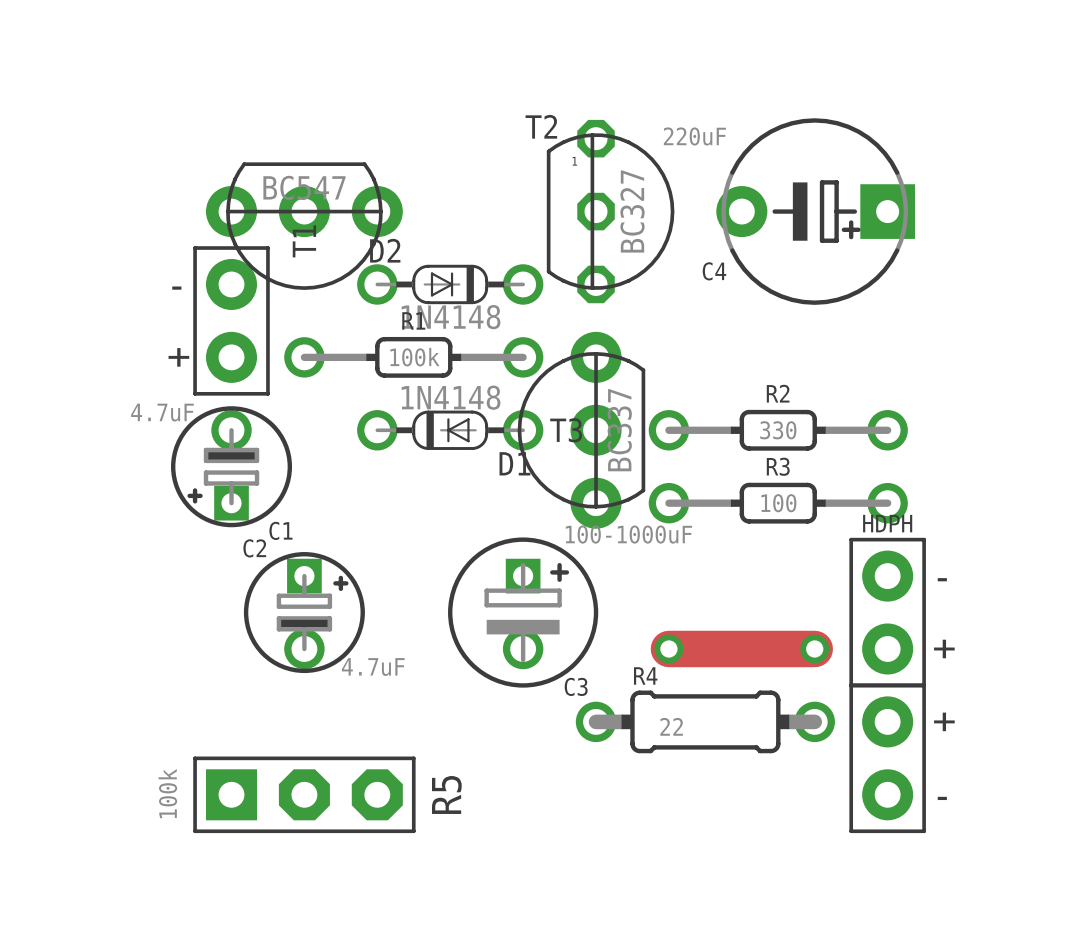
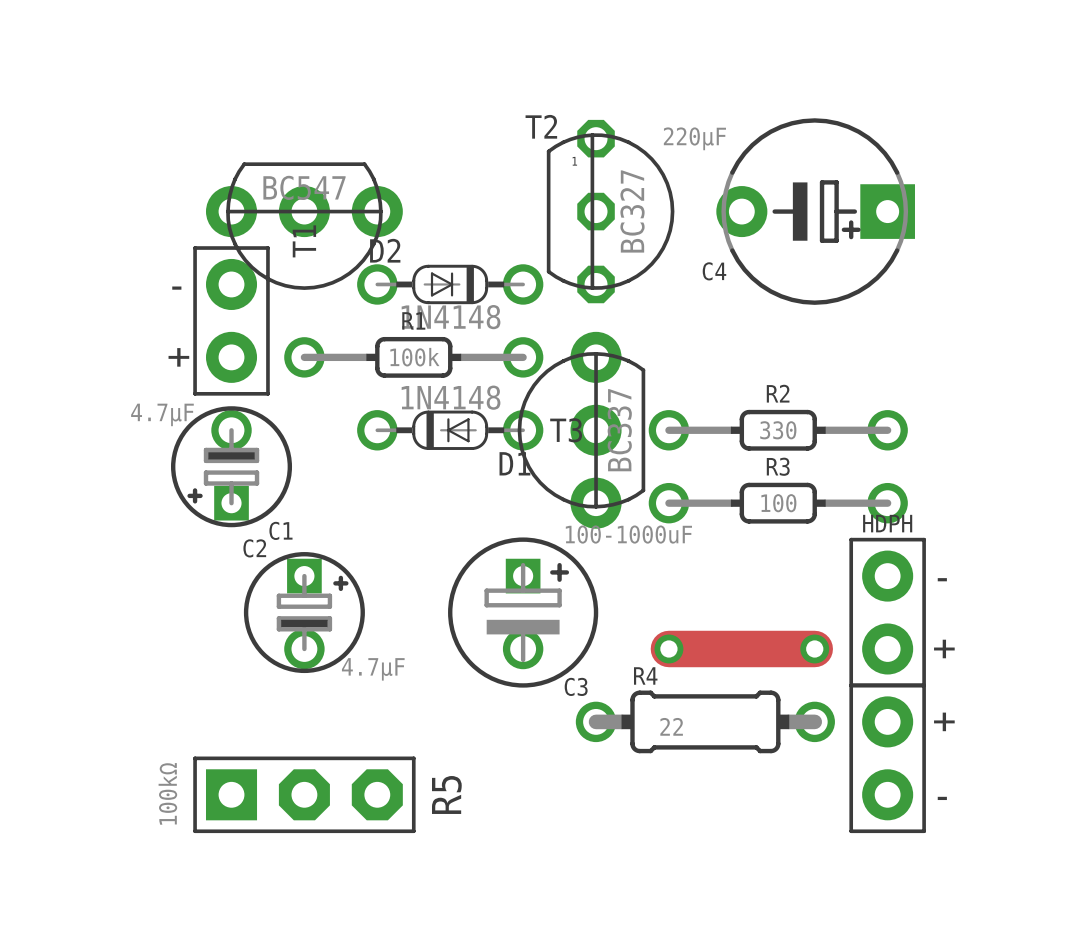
C4 value: 220uF (694, 136) -> 220μF (694, 138)
C1 value: 4.7uF (162, 412) -> 4.7μF (162, 414)
C2 value: 4.7uF (373, 667) -> 4.7μF (373, 669)
R5 value: 100k (167, 793) -> 100kΩ (167, 793)

